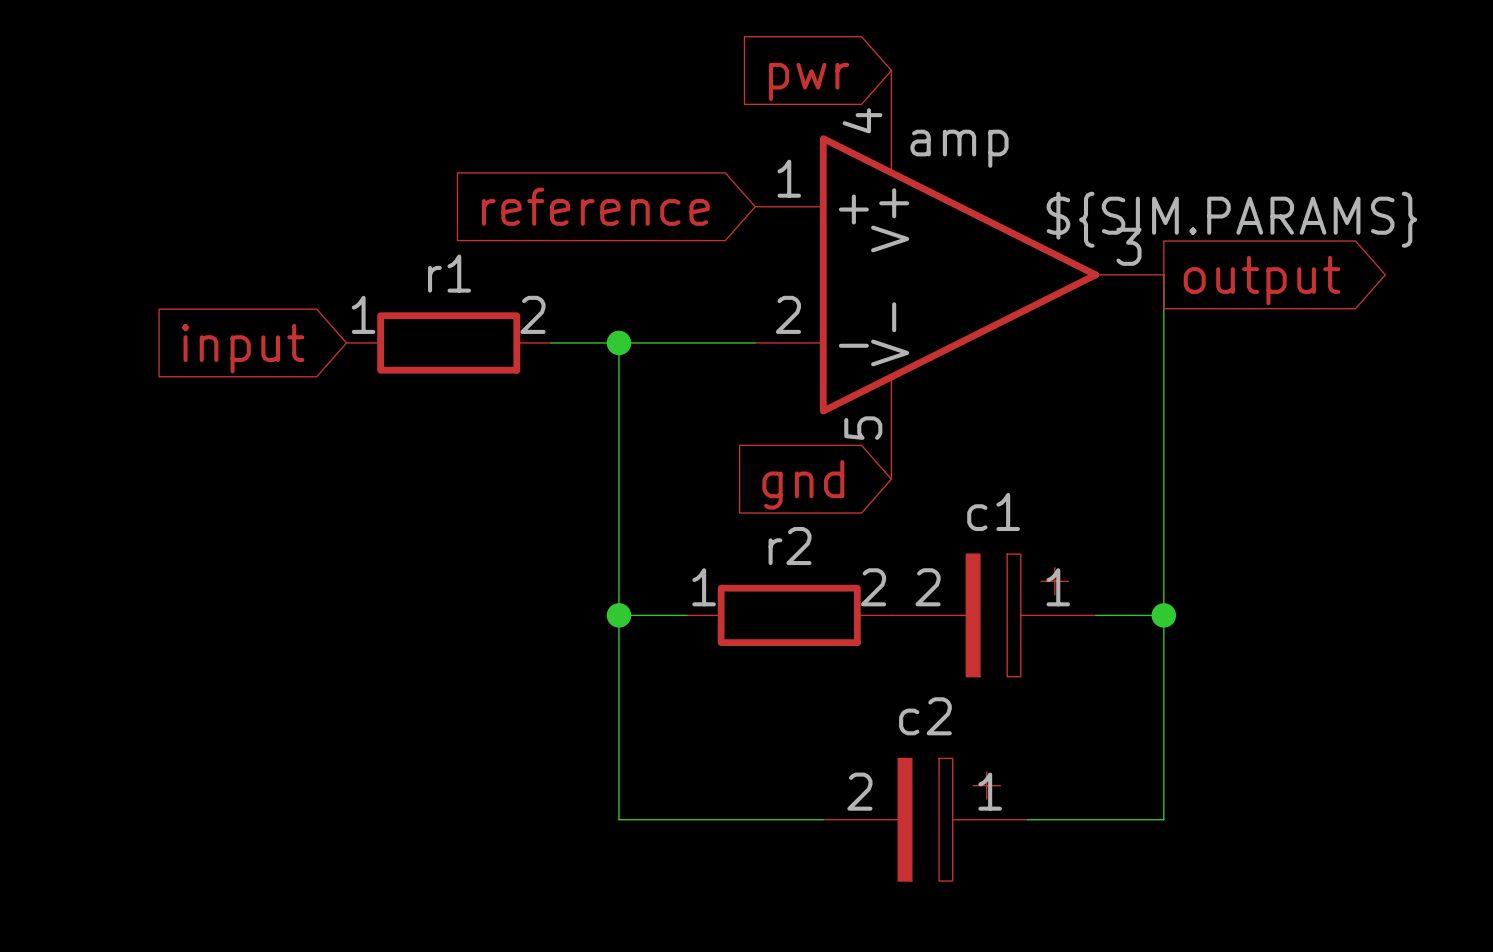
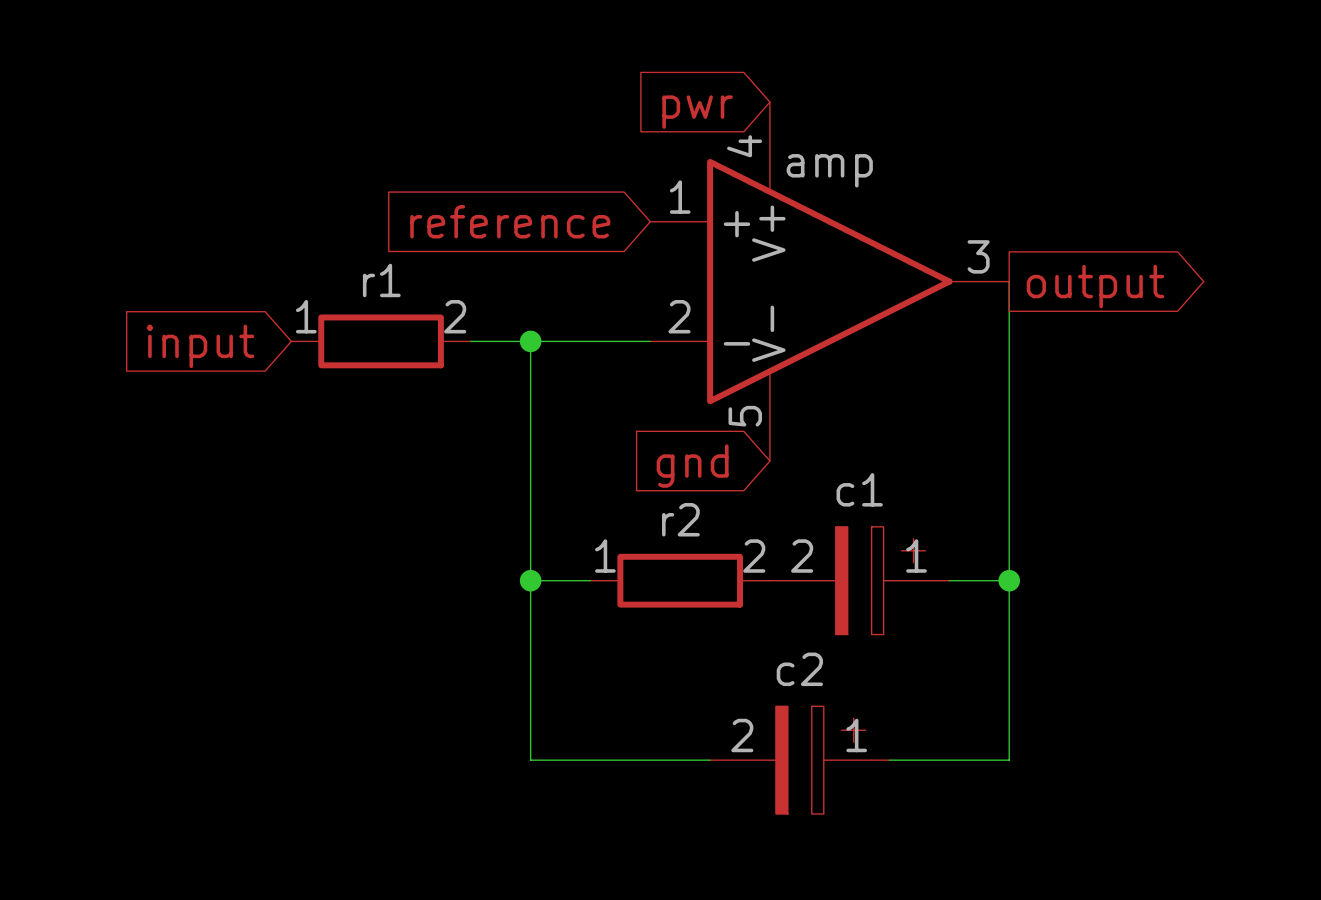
amp value: ${SIM.PARAMS} (1231, 219) -> none

